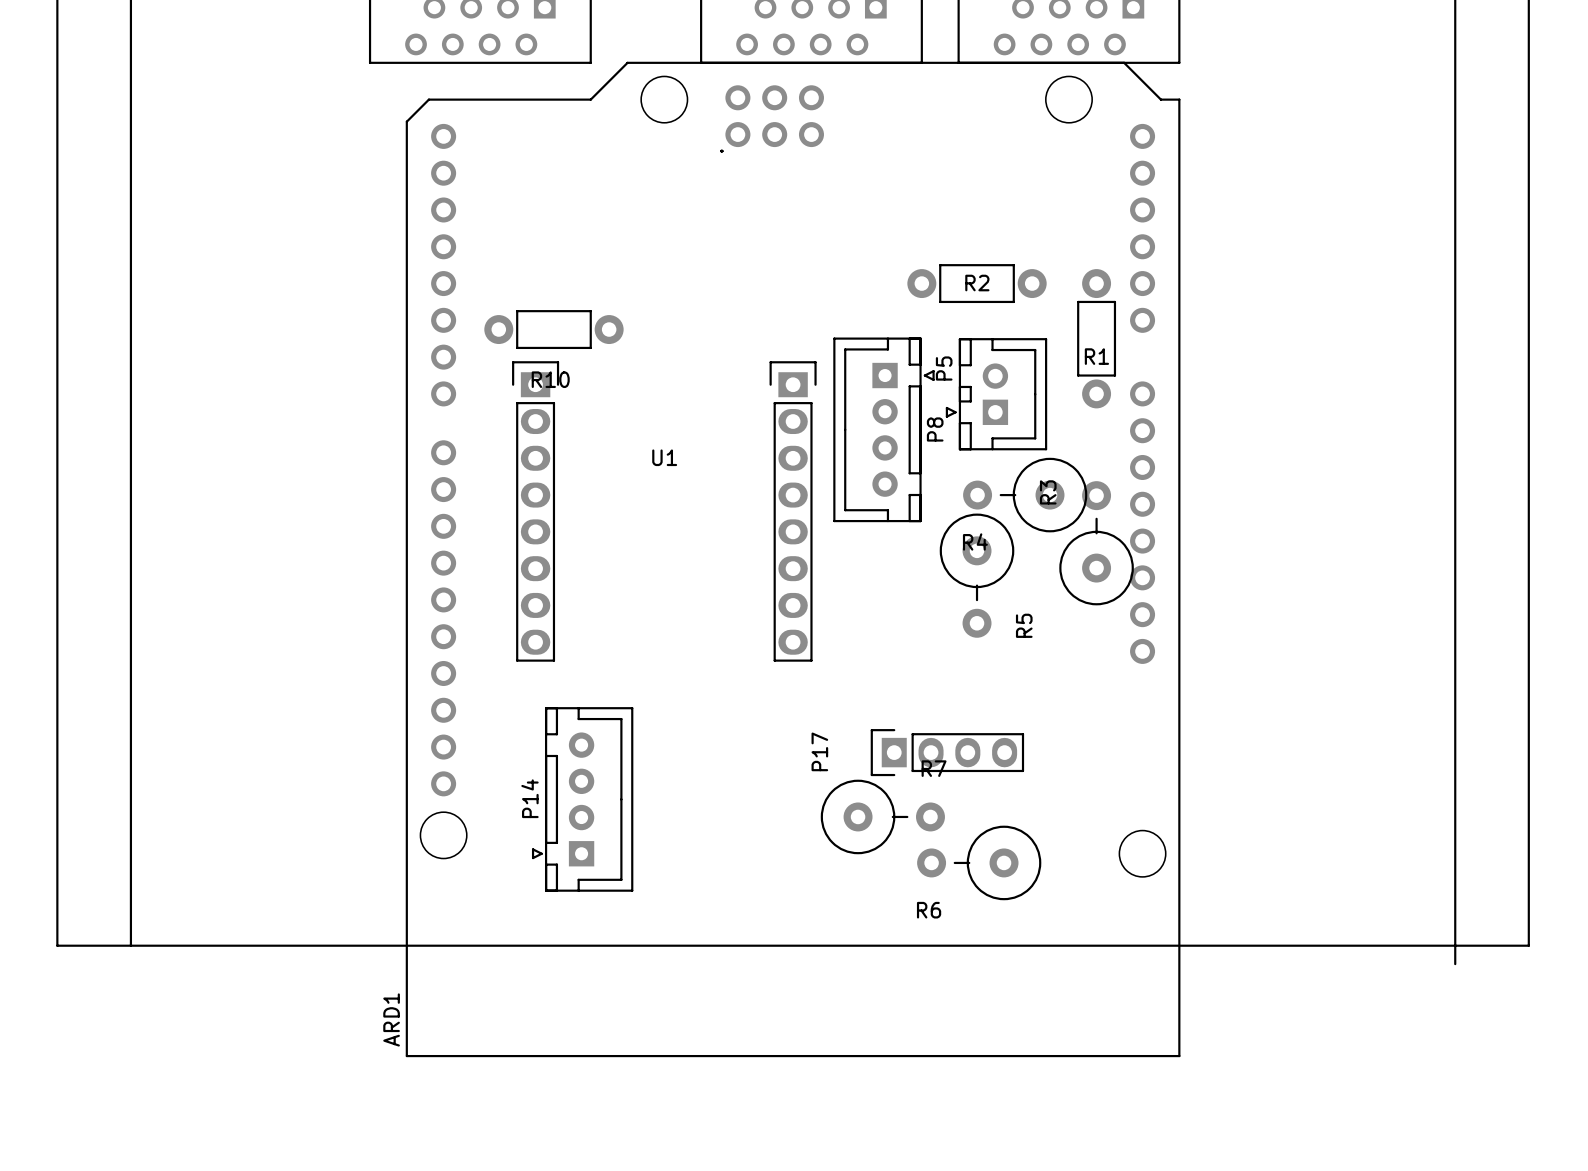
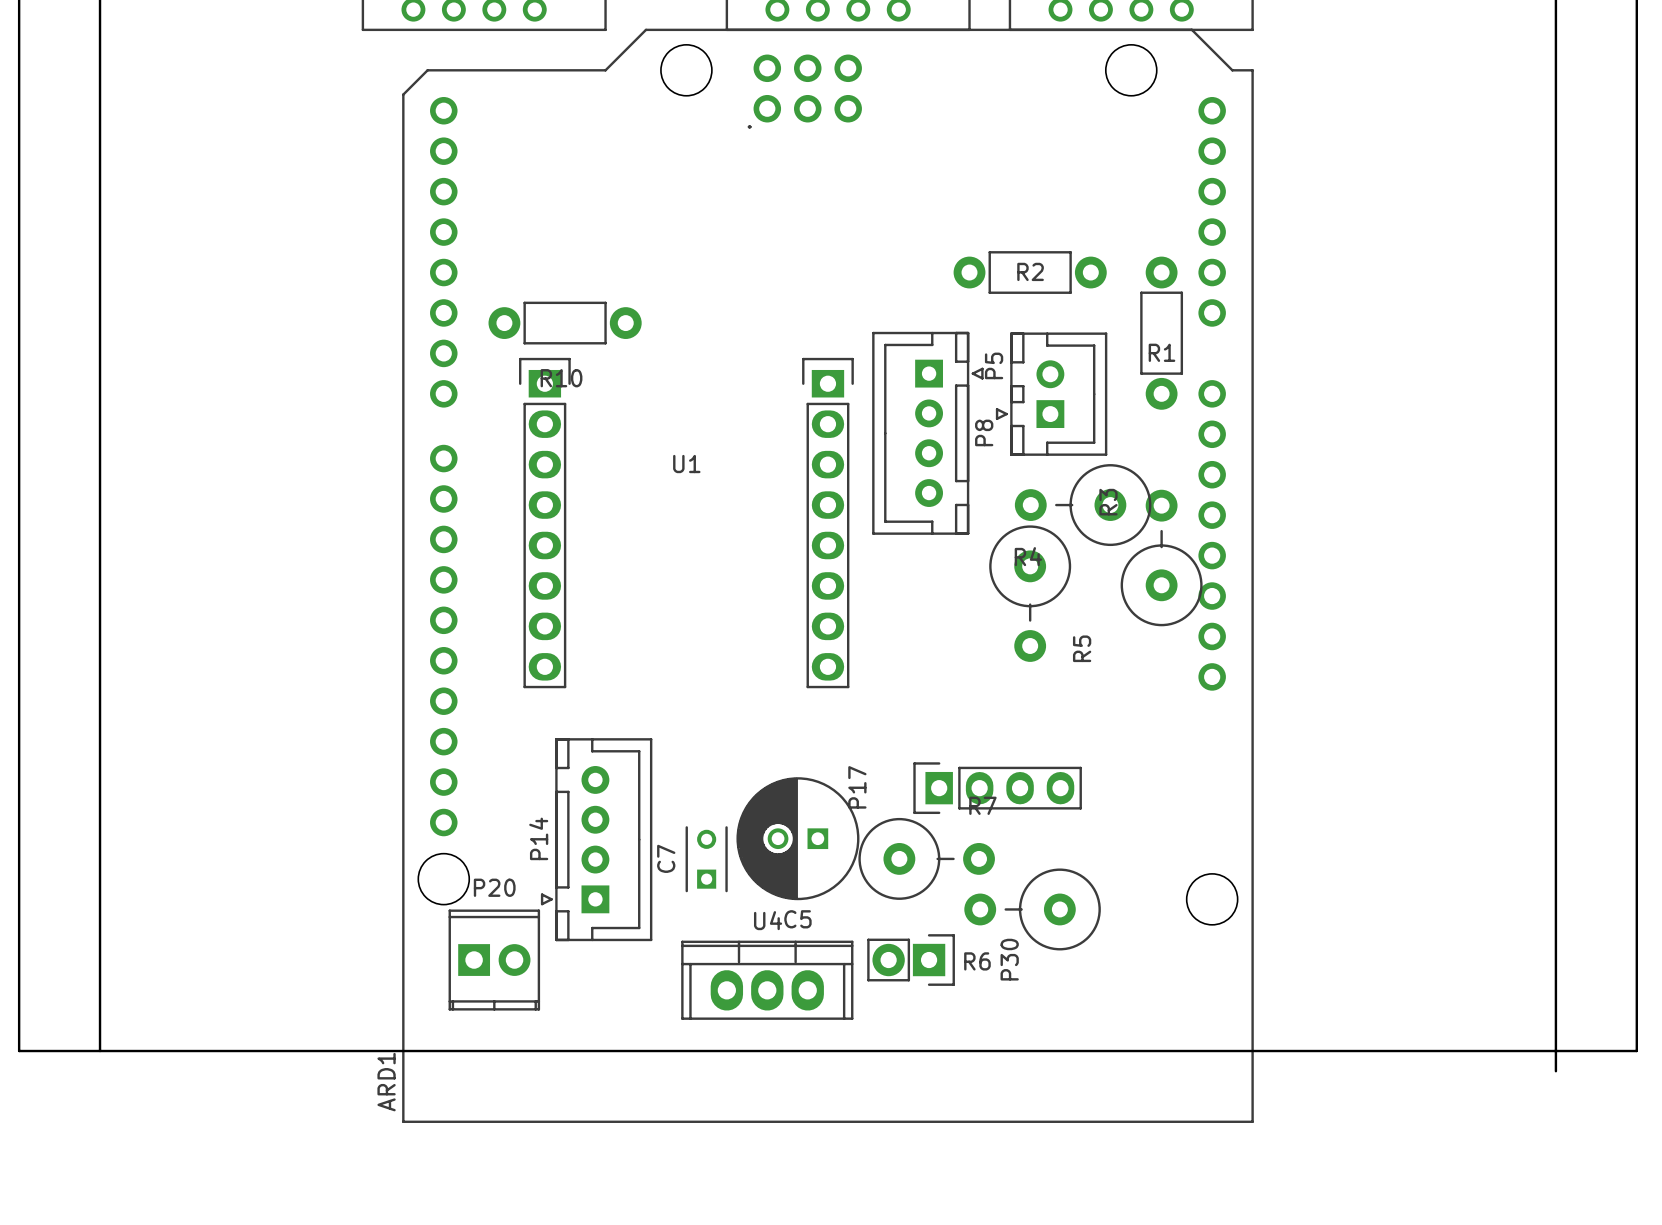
C5: none -> (797, 838)
C7: none -> (706, 859)
P20: none -> (494, 960)
P30: none -> (911, 960)
U4: none -> (767, 980)
board edge: (57, 945) (1528, 945) -> (19, 1000) (19, 1051) (1636, 1051) (1636, 1000)
board edge: none -> (100, 1000) (100, 1051)
board edge: none -> (1555, 1020) (1555, 1071)

